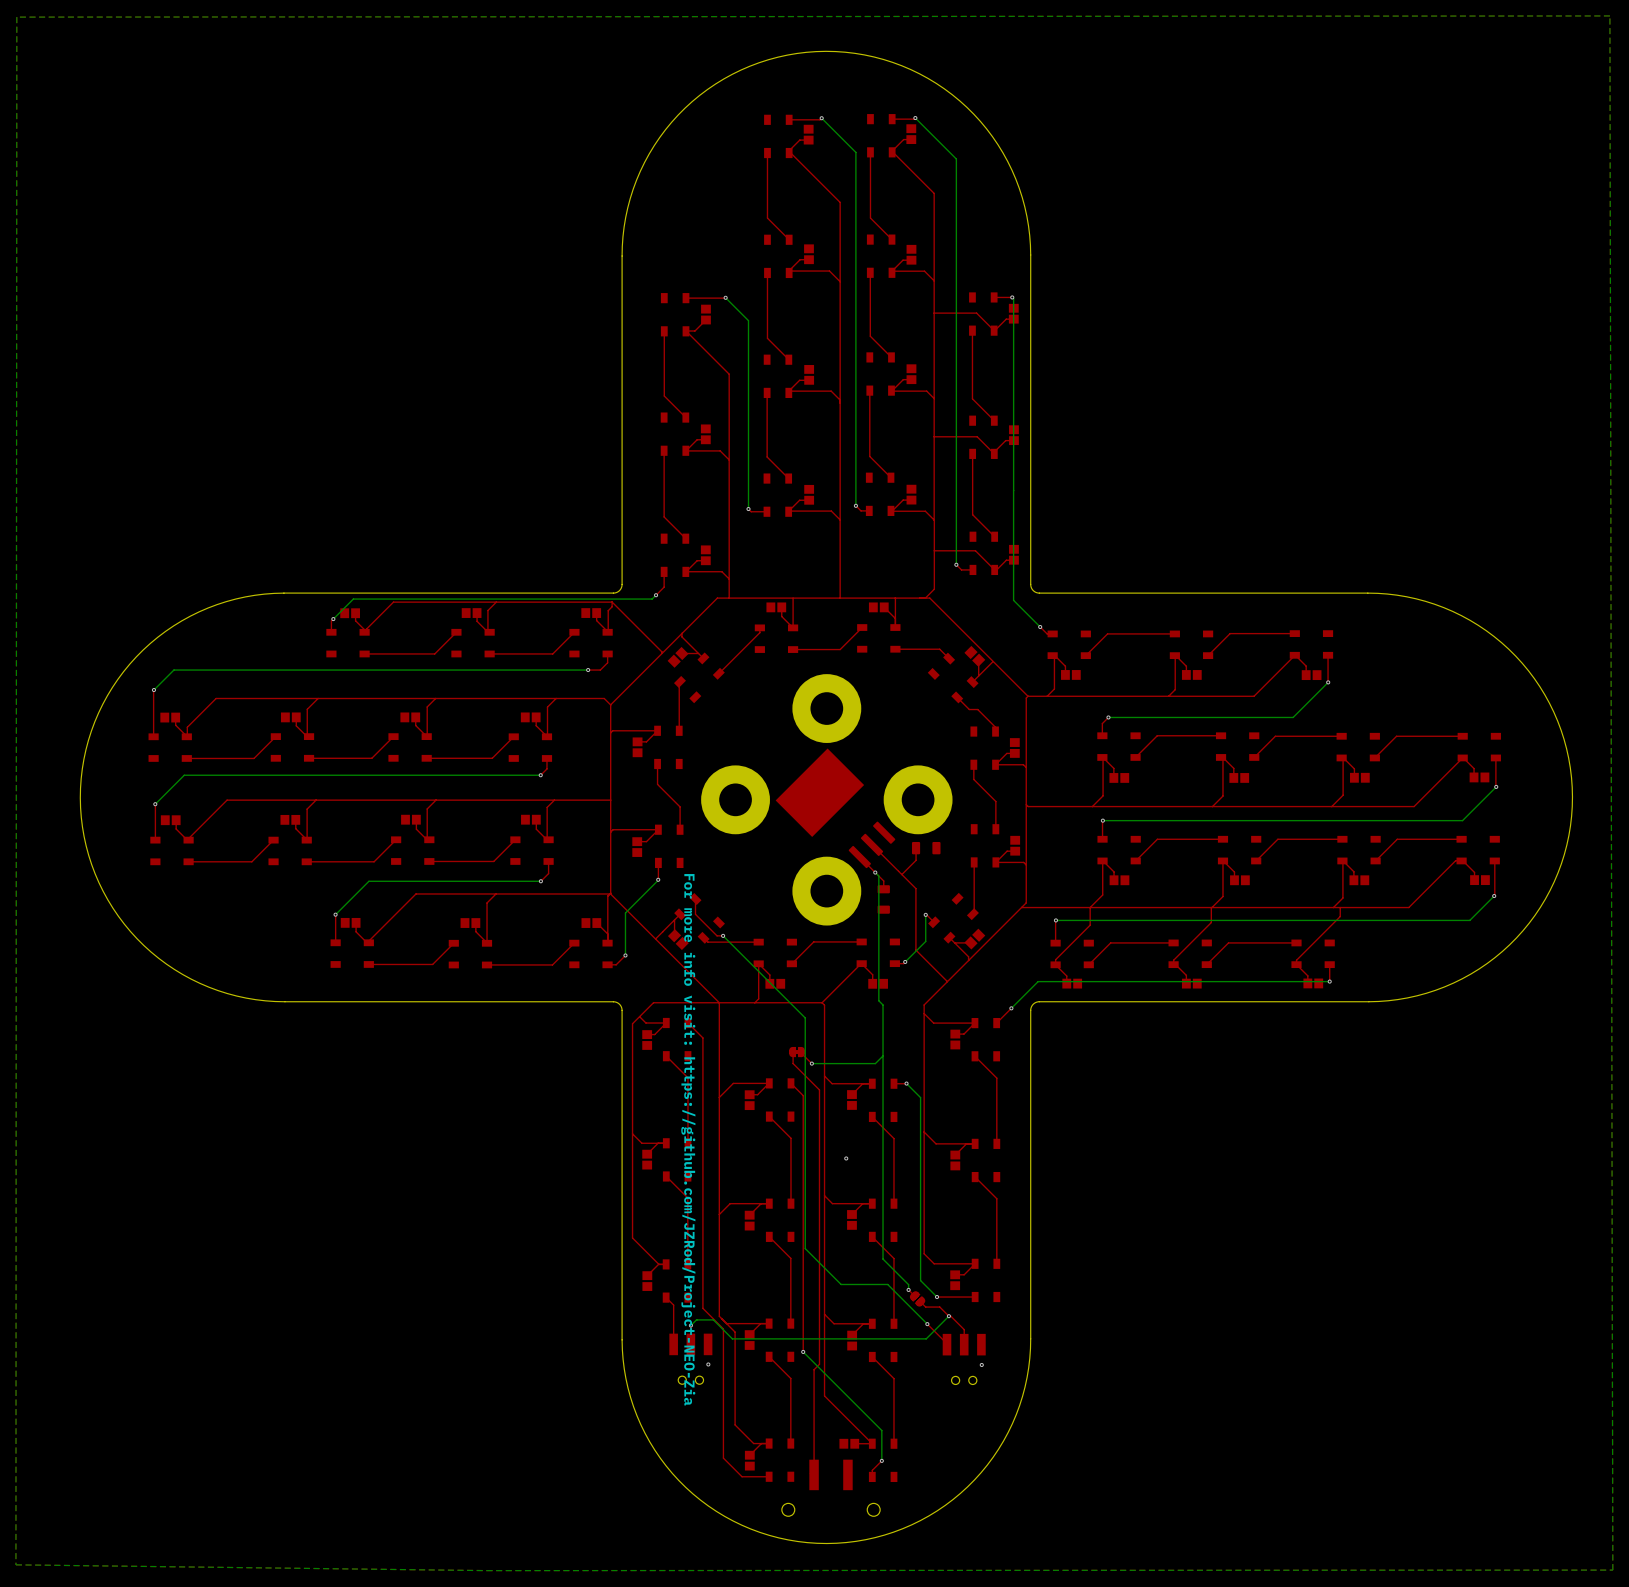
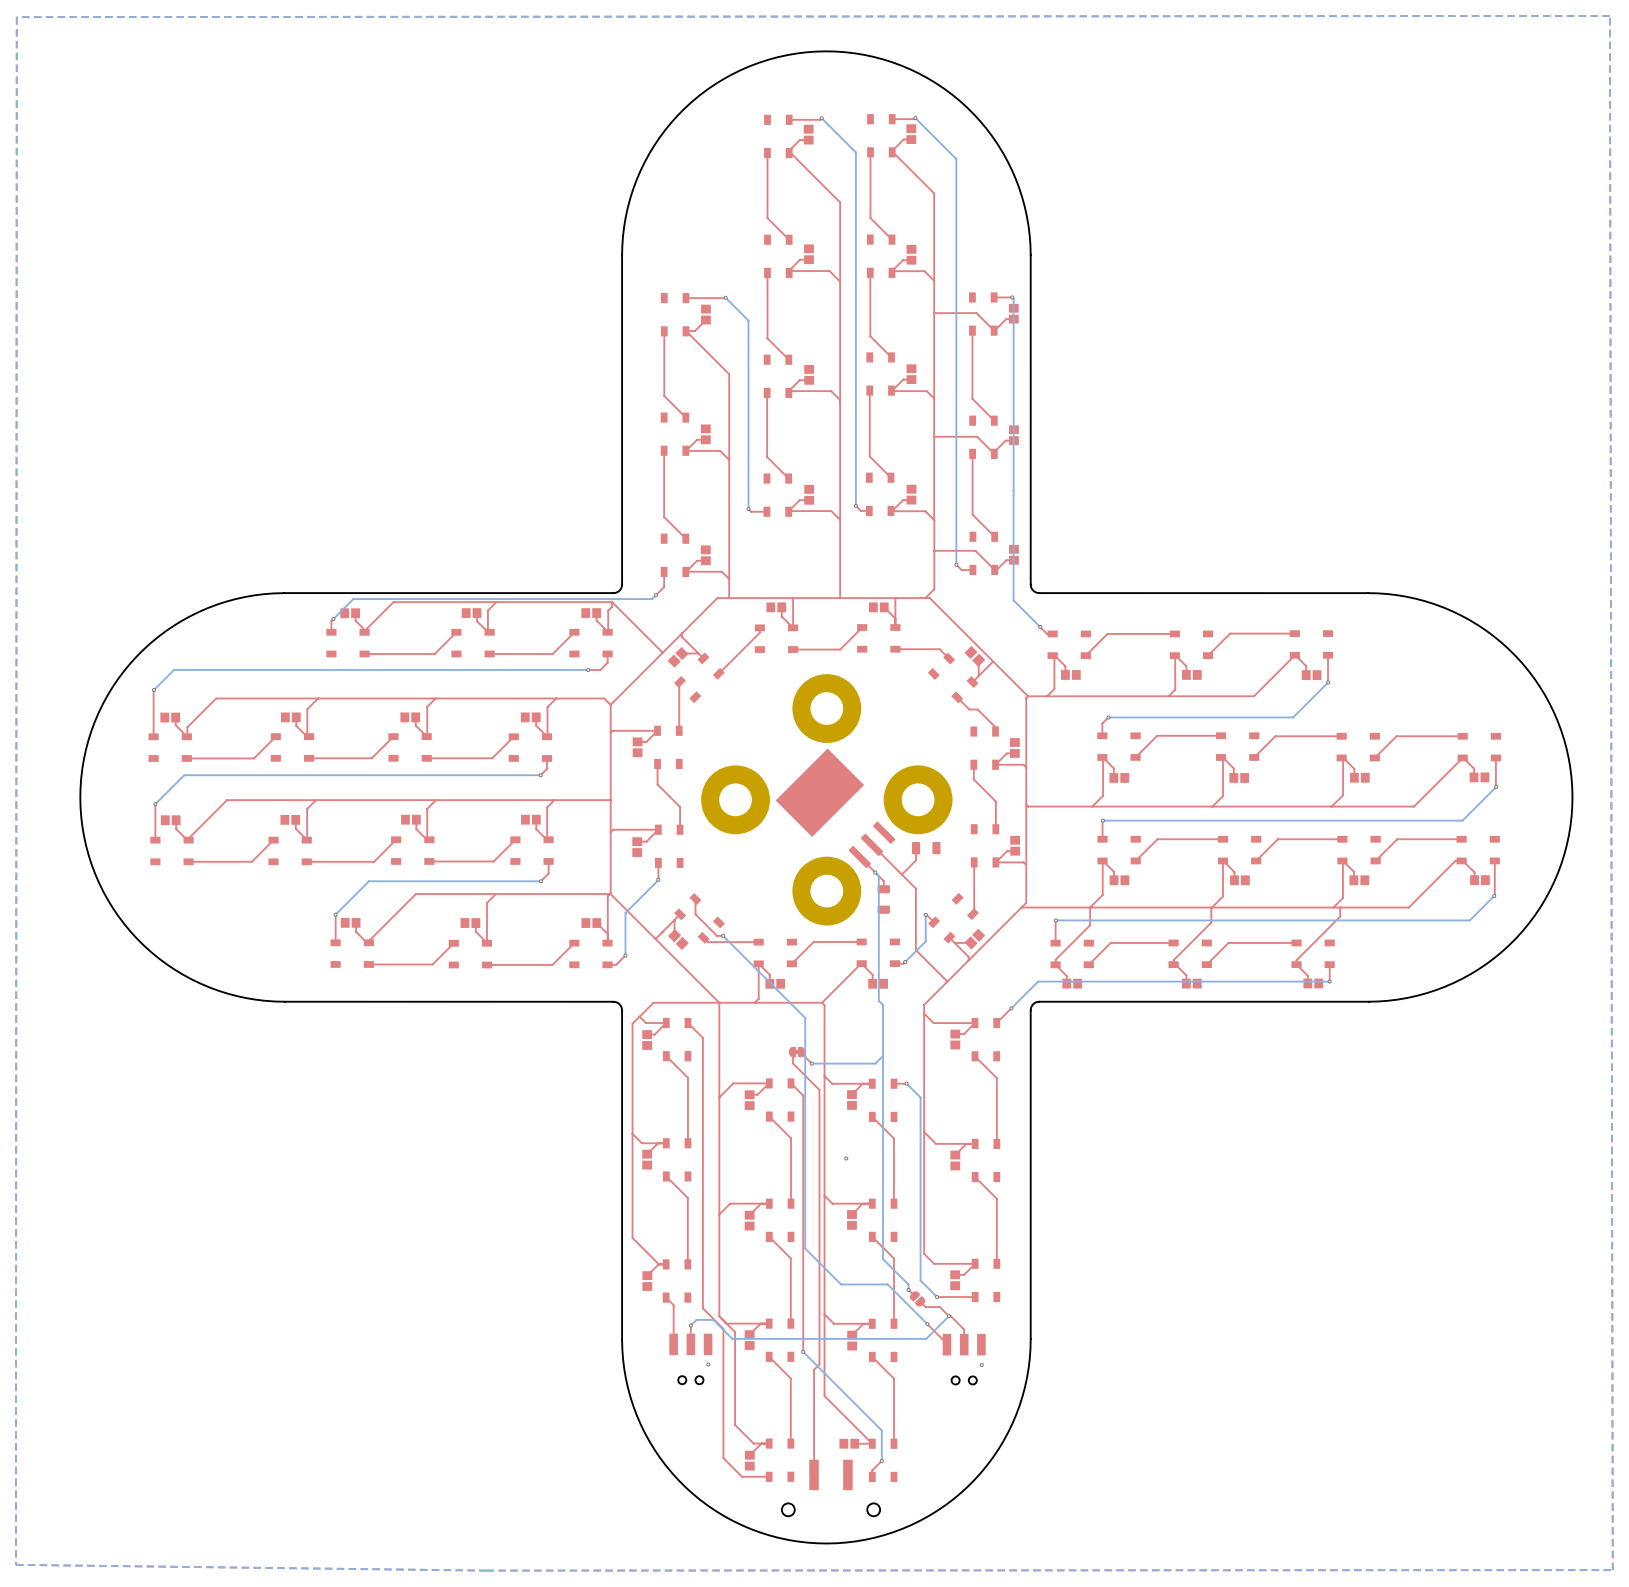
text: For more info visit: https://github.com/JZRod/Project-NEO-Zia (688, 1139) -> none

